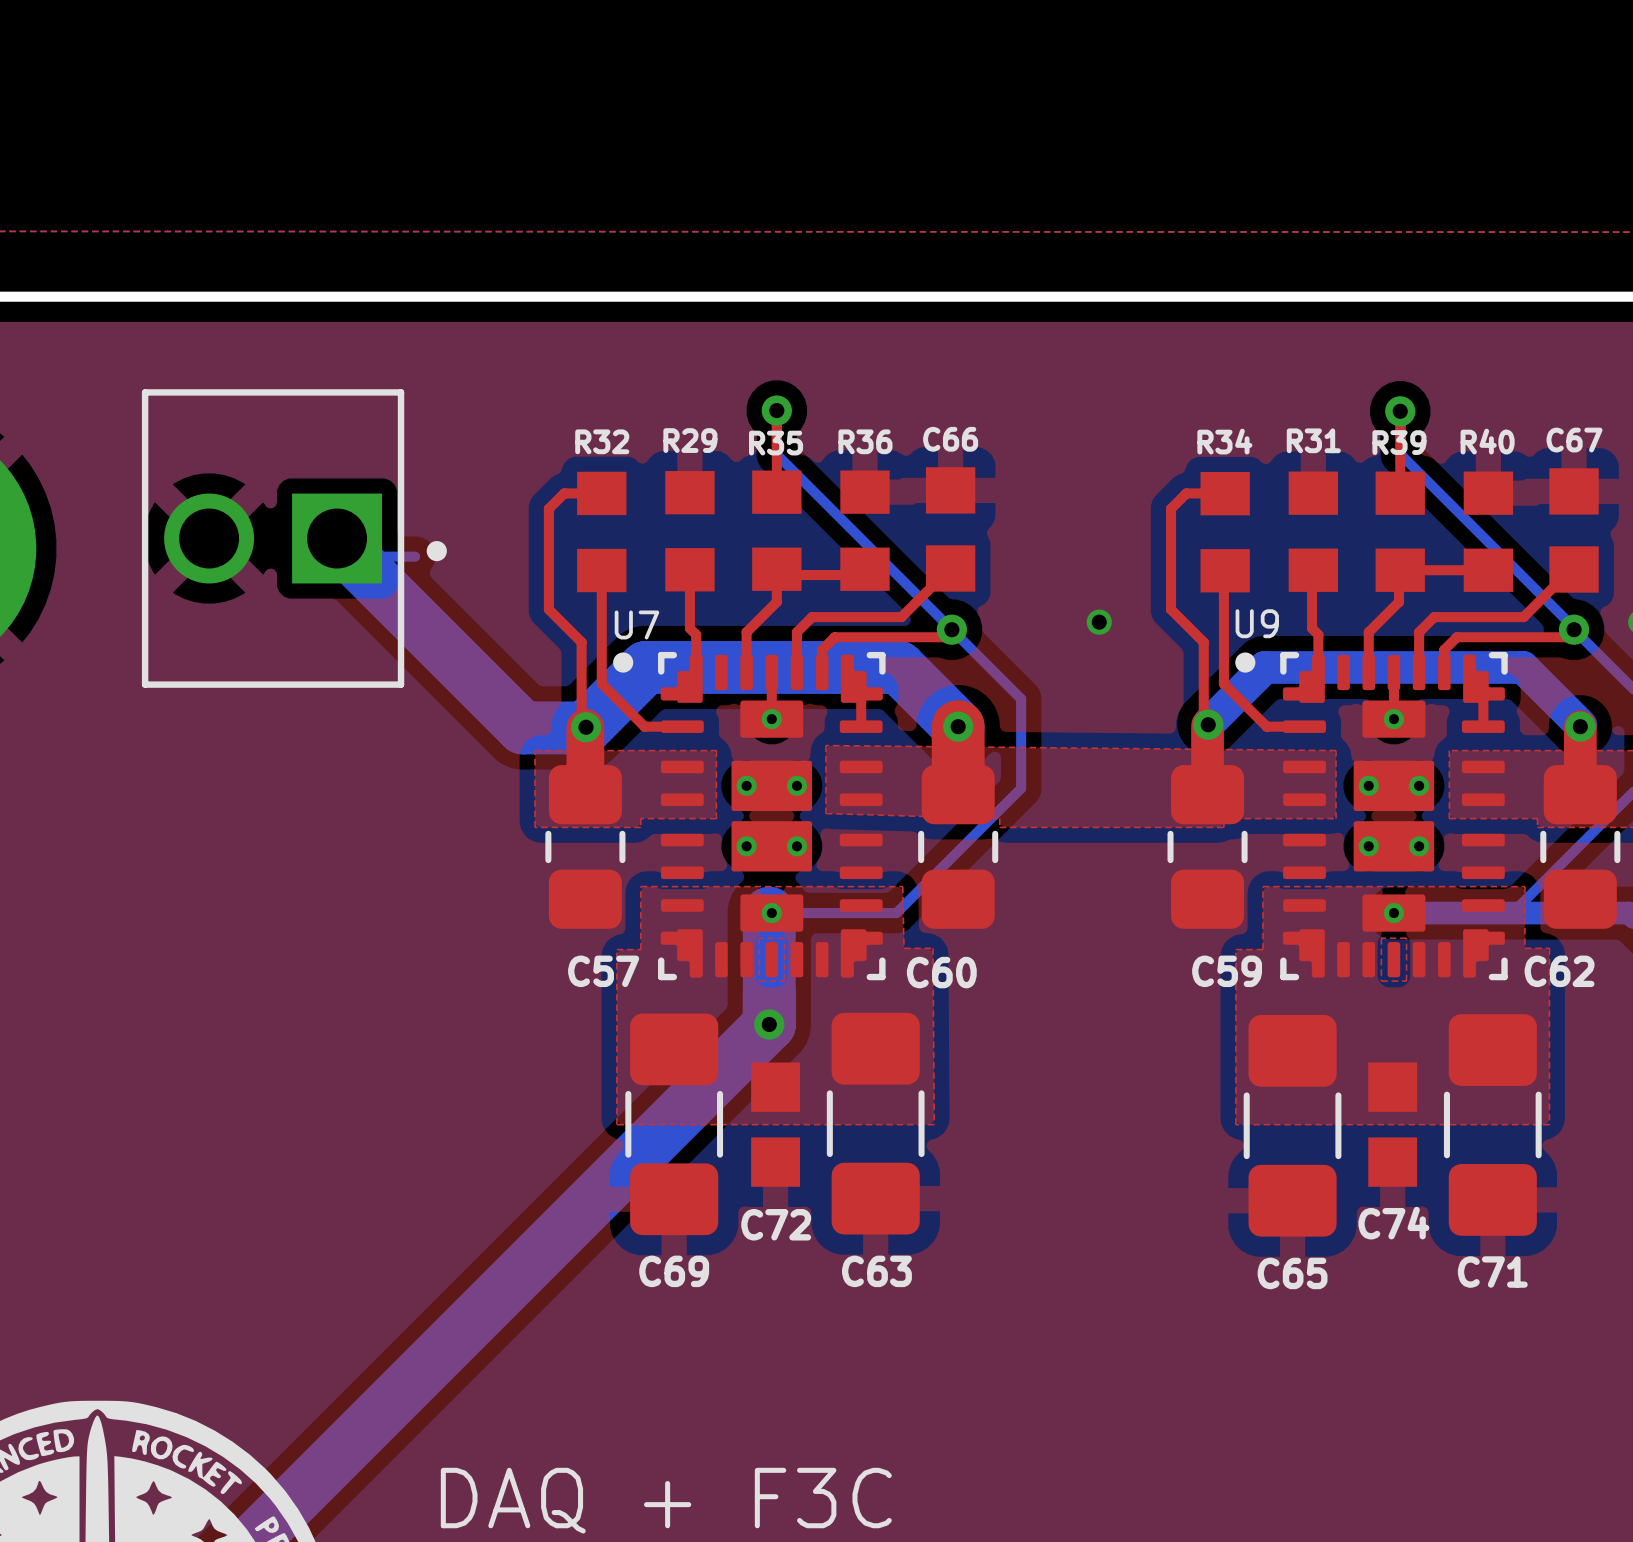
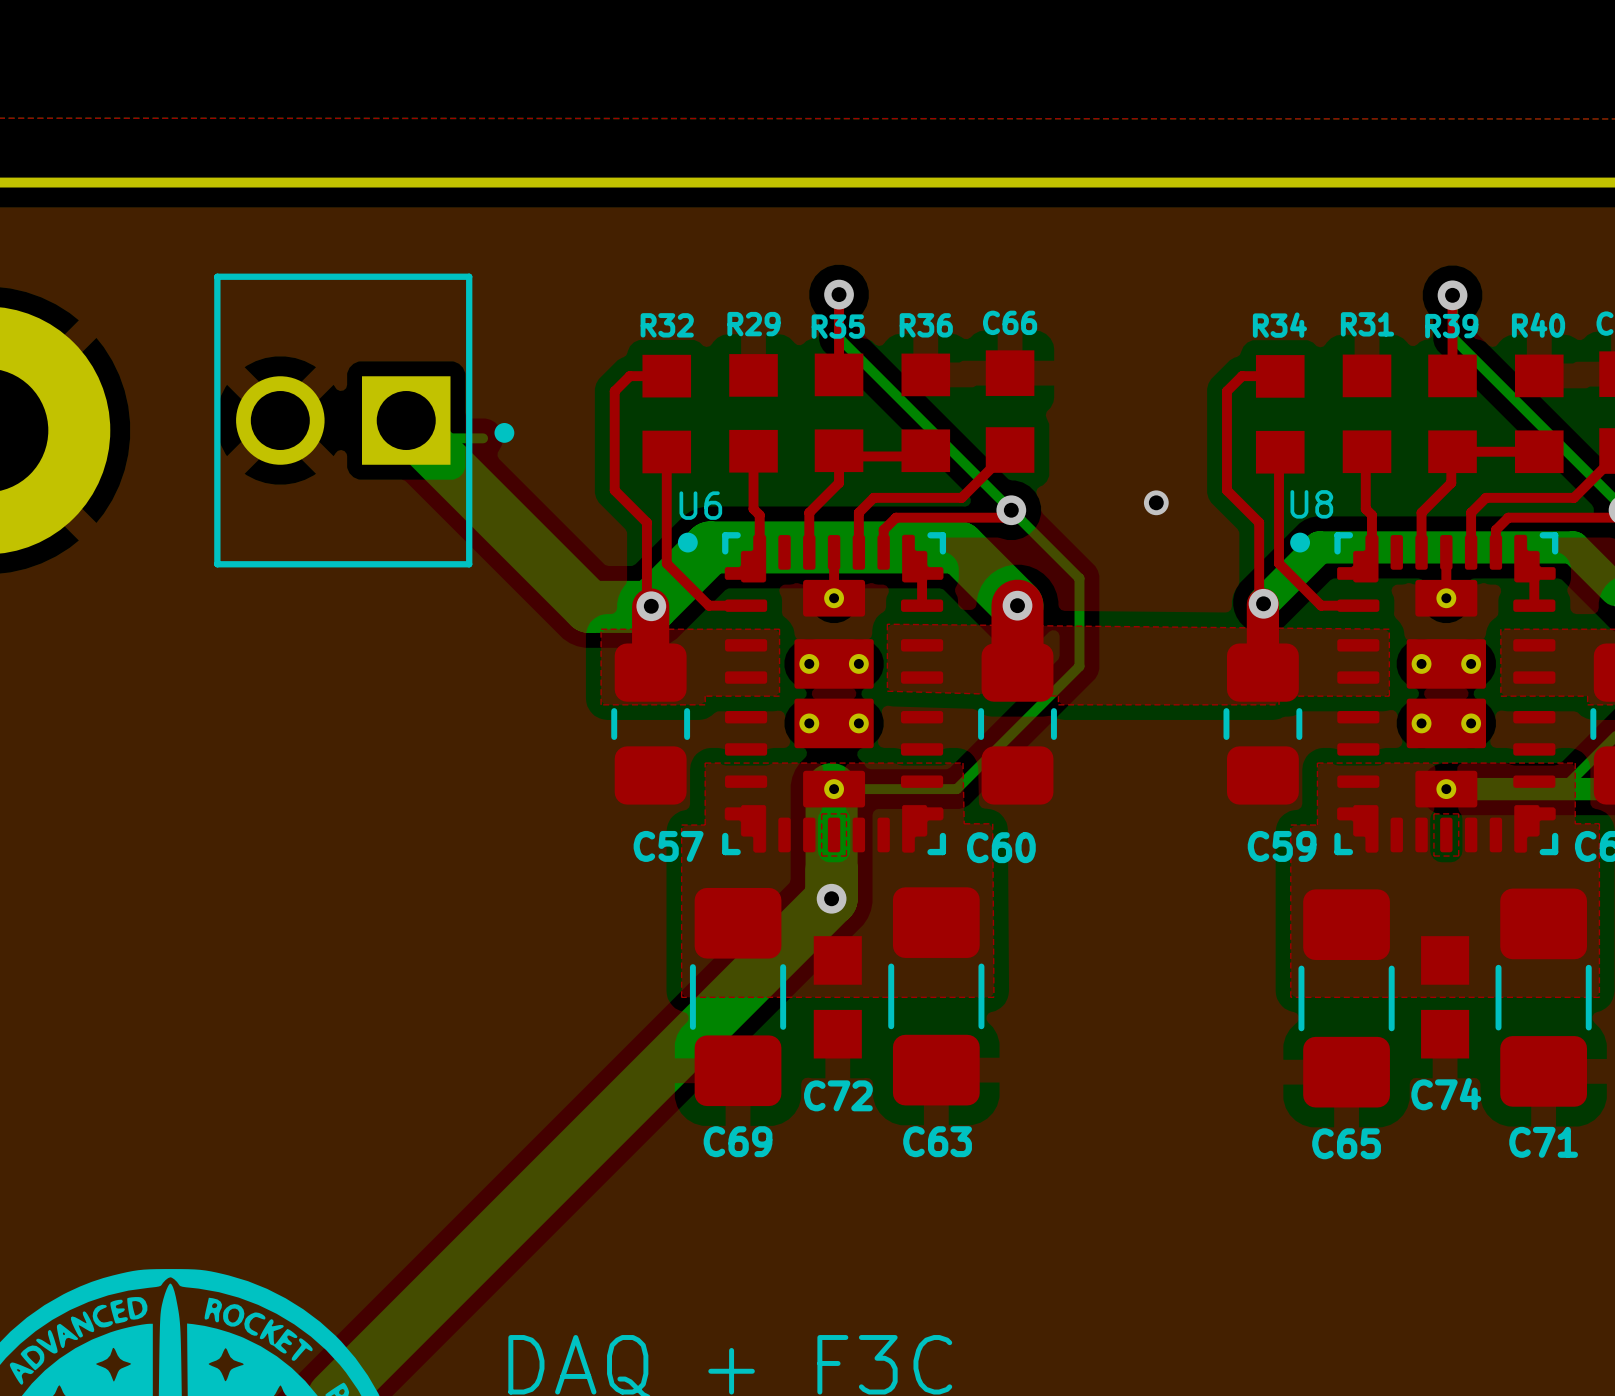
U9 name: U9 (1257, 623) -> U8 (1311, 504)
U7 name: U7 (636, 624) -> U6 (700, 505)

